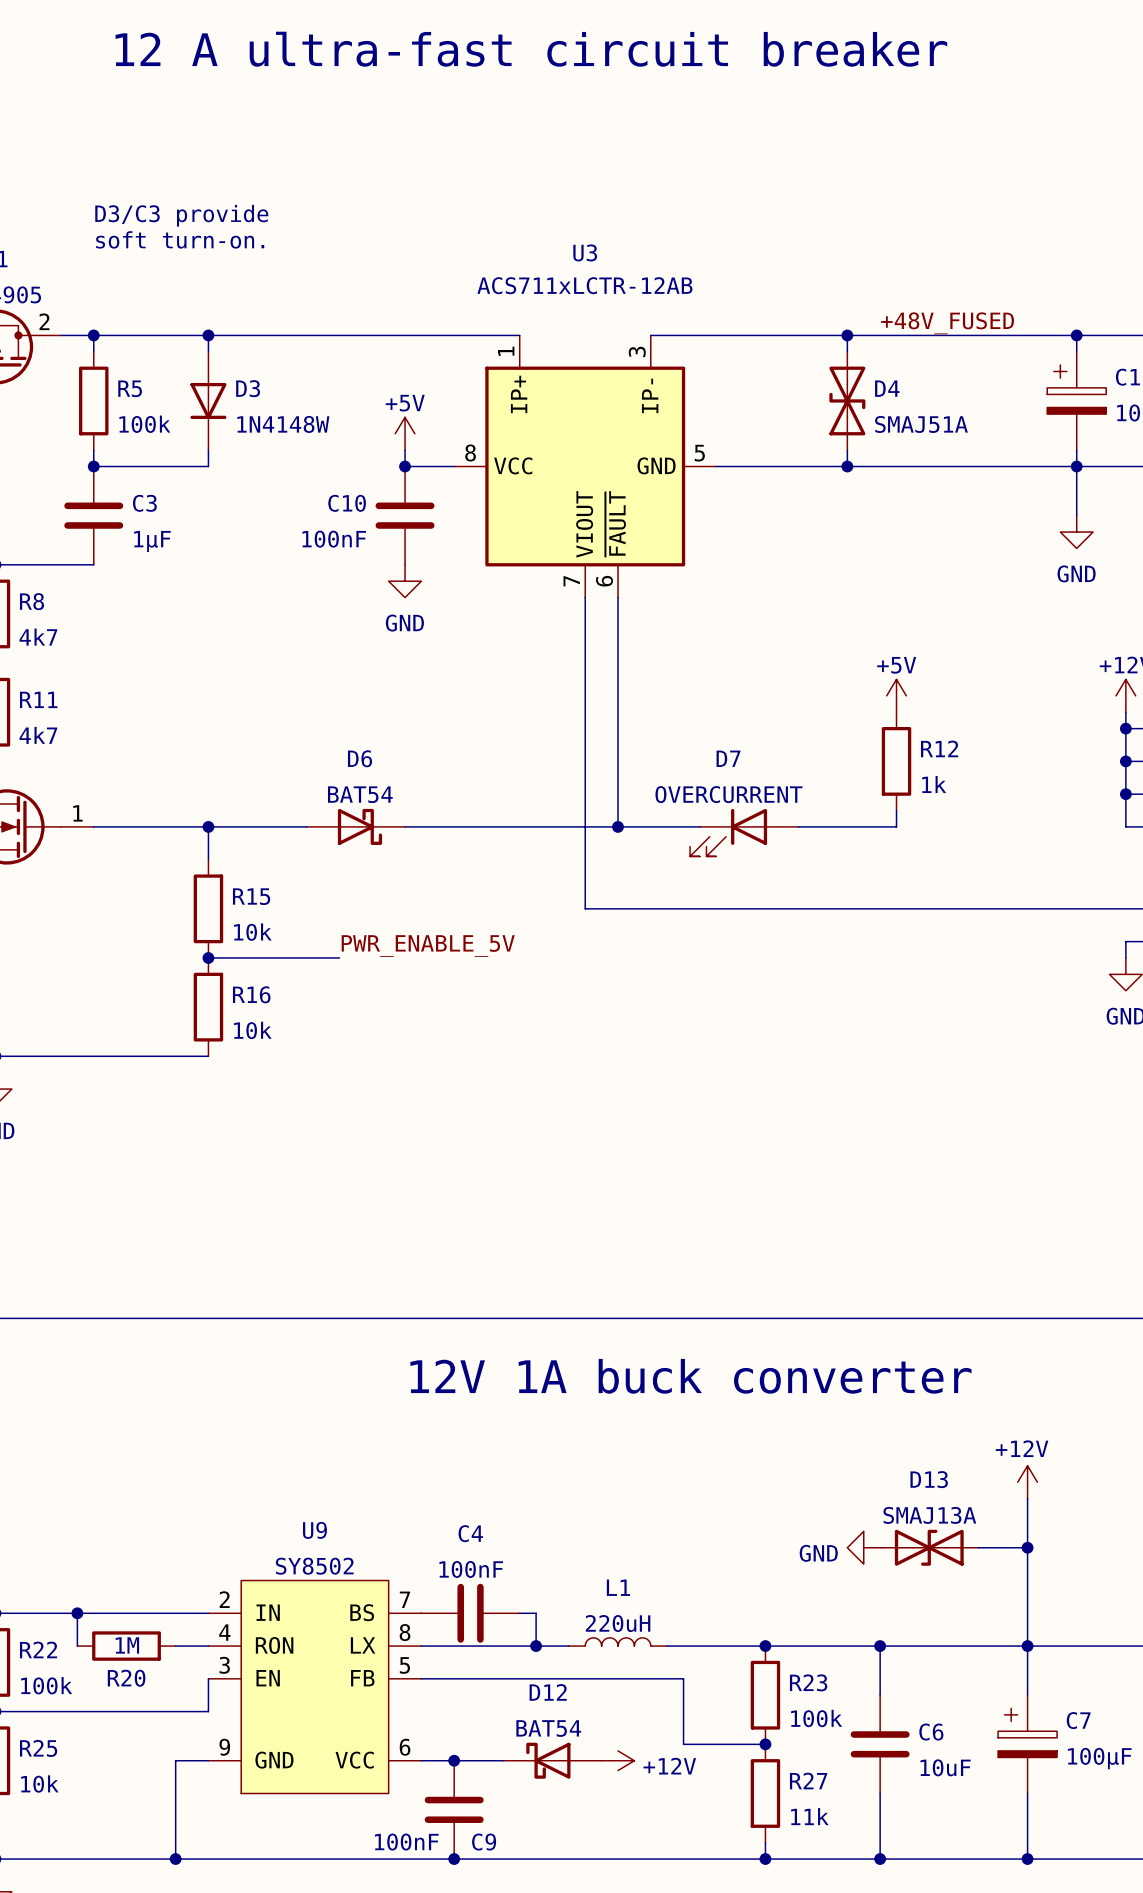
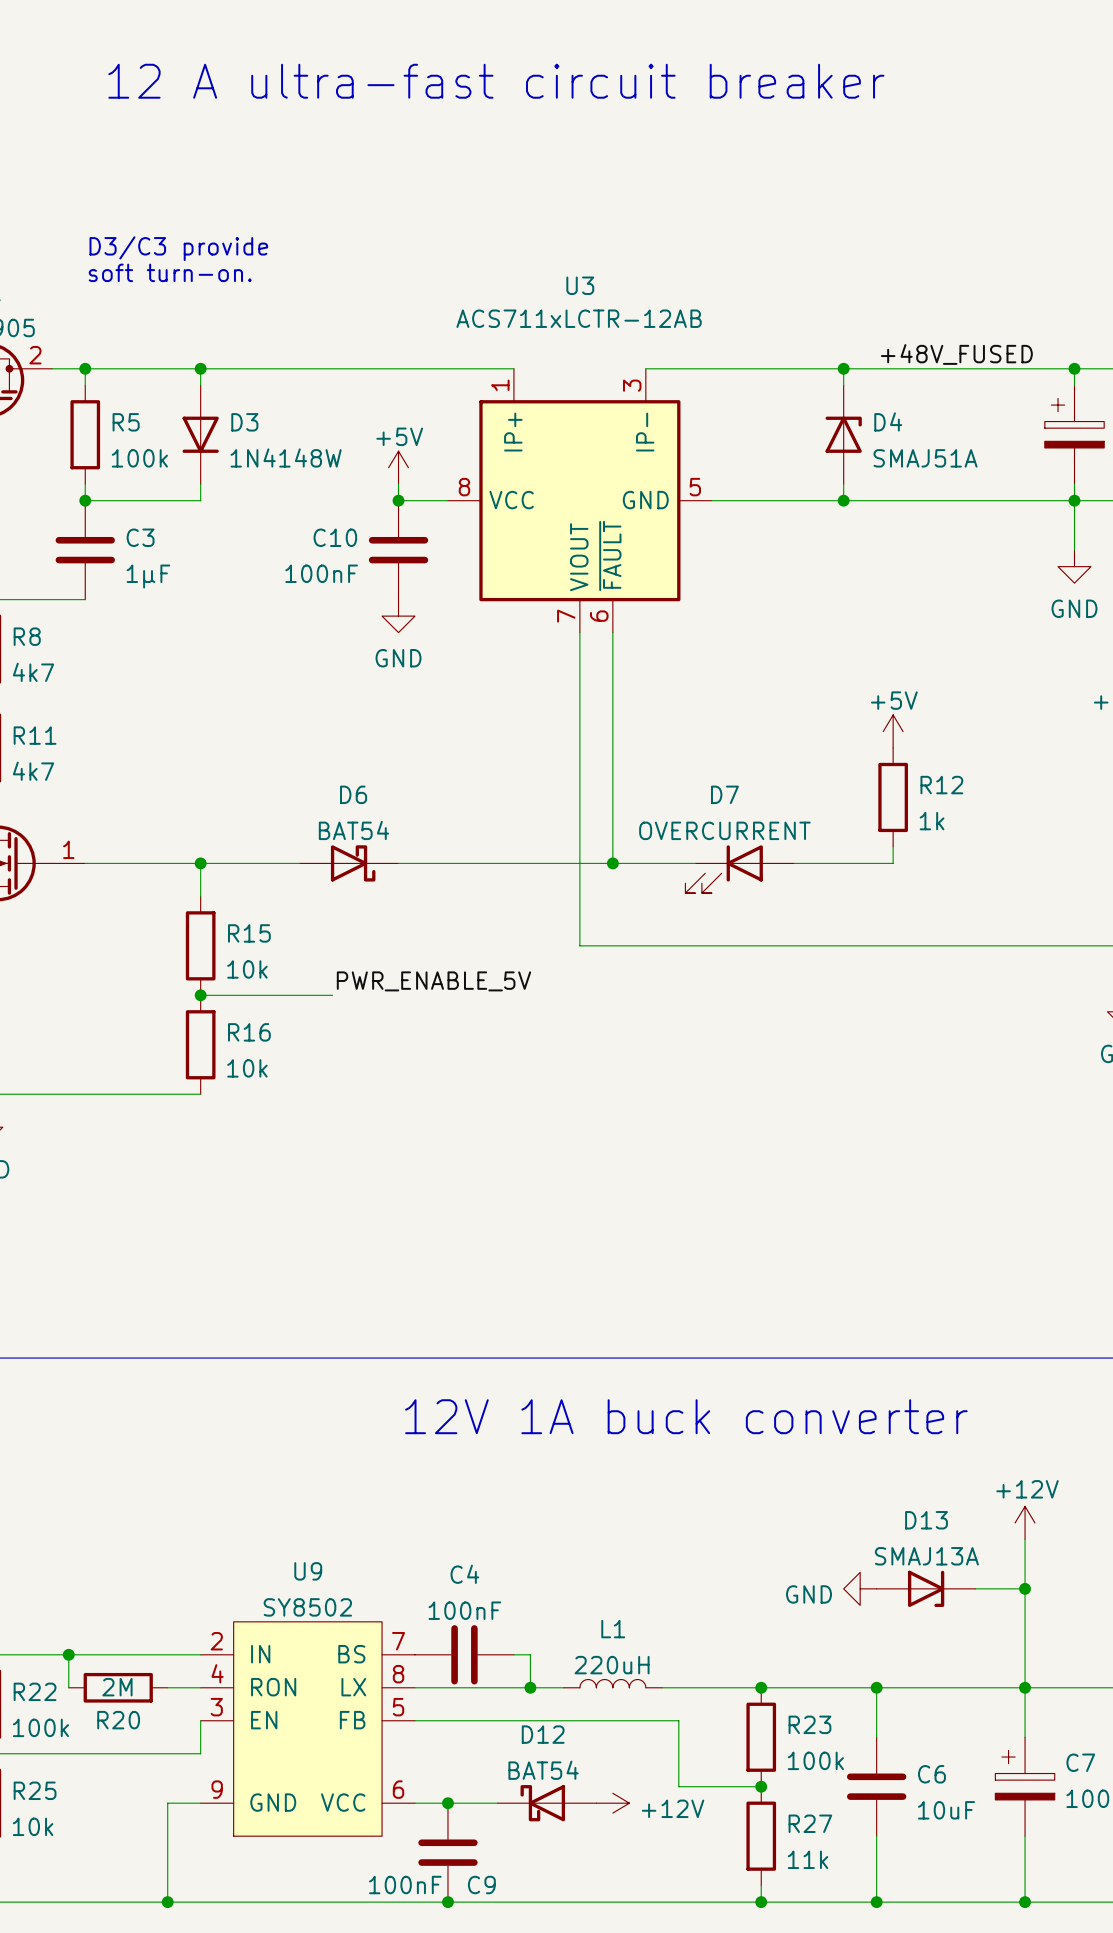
D4 symbol: [829, 351, 866, 451] -> [825, 385, 862, 485]
D13 symbol: [880, 1529, 979, 1566] -> [876, 1570, 976, 1607]
R20 value: 1M (127, 1645) -> 2M (117, 1687)

